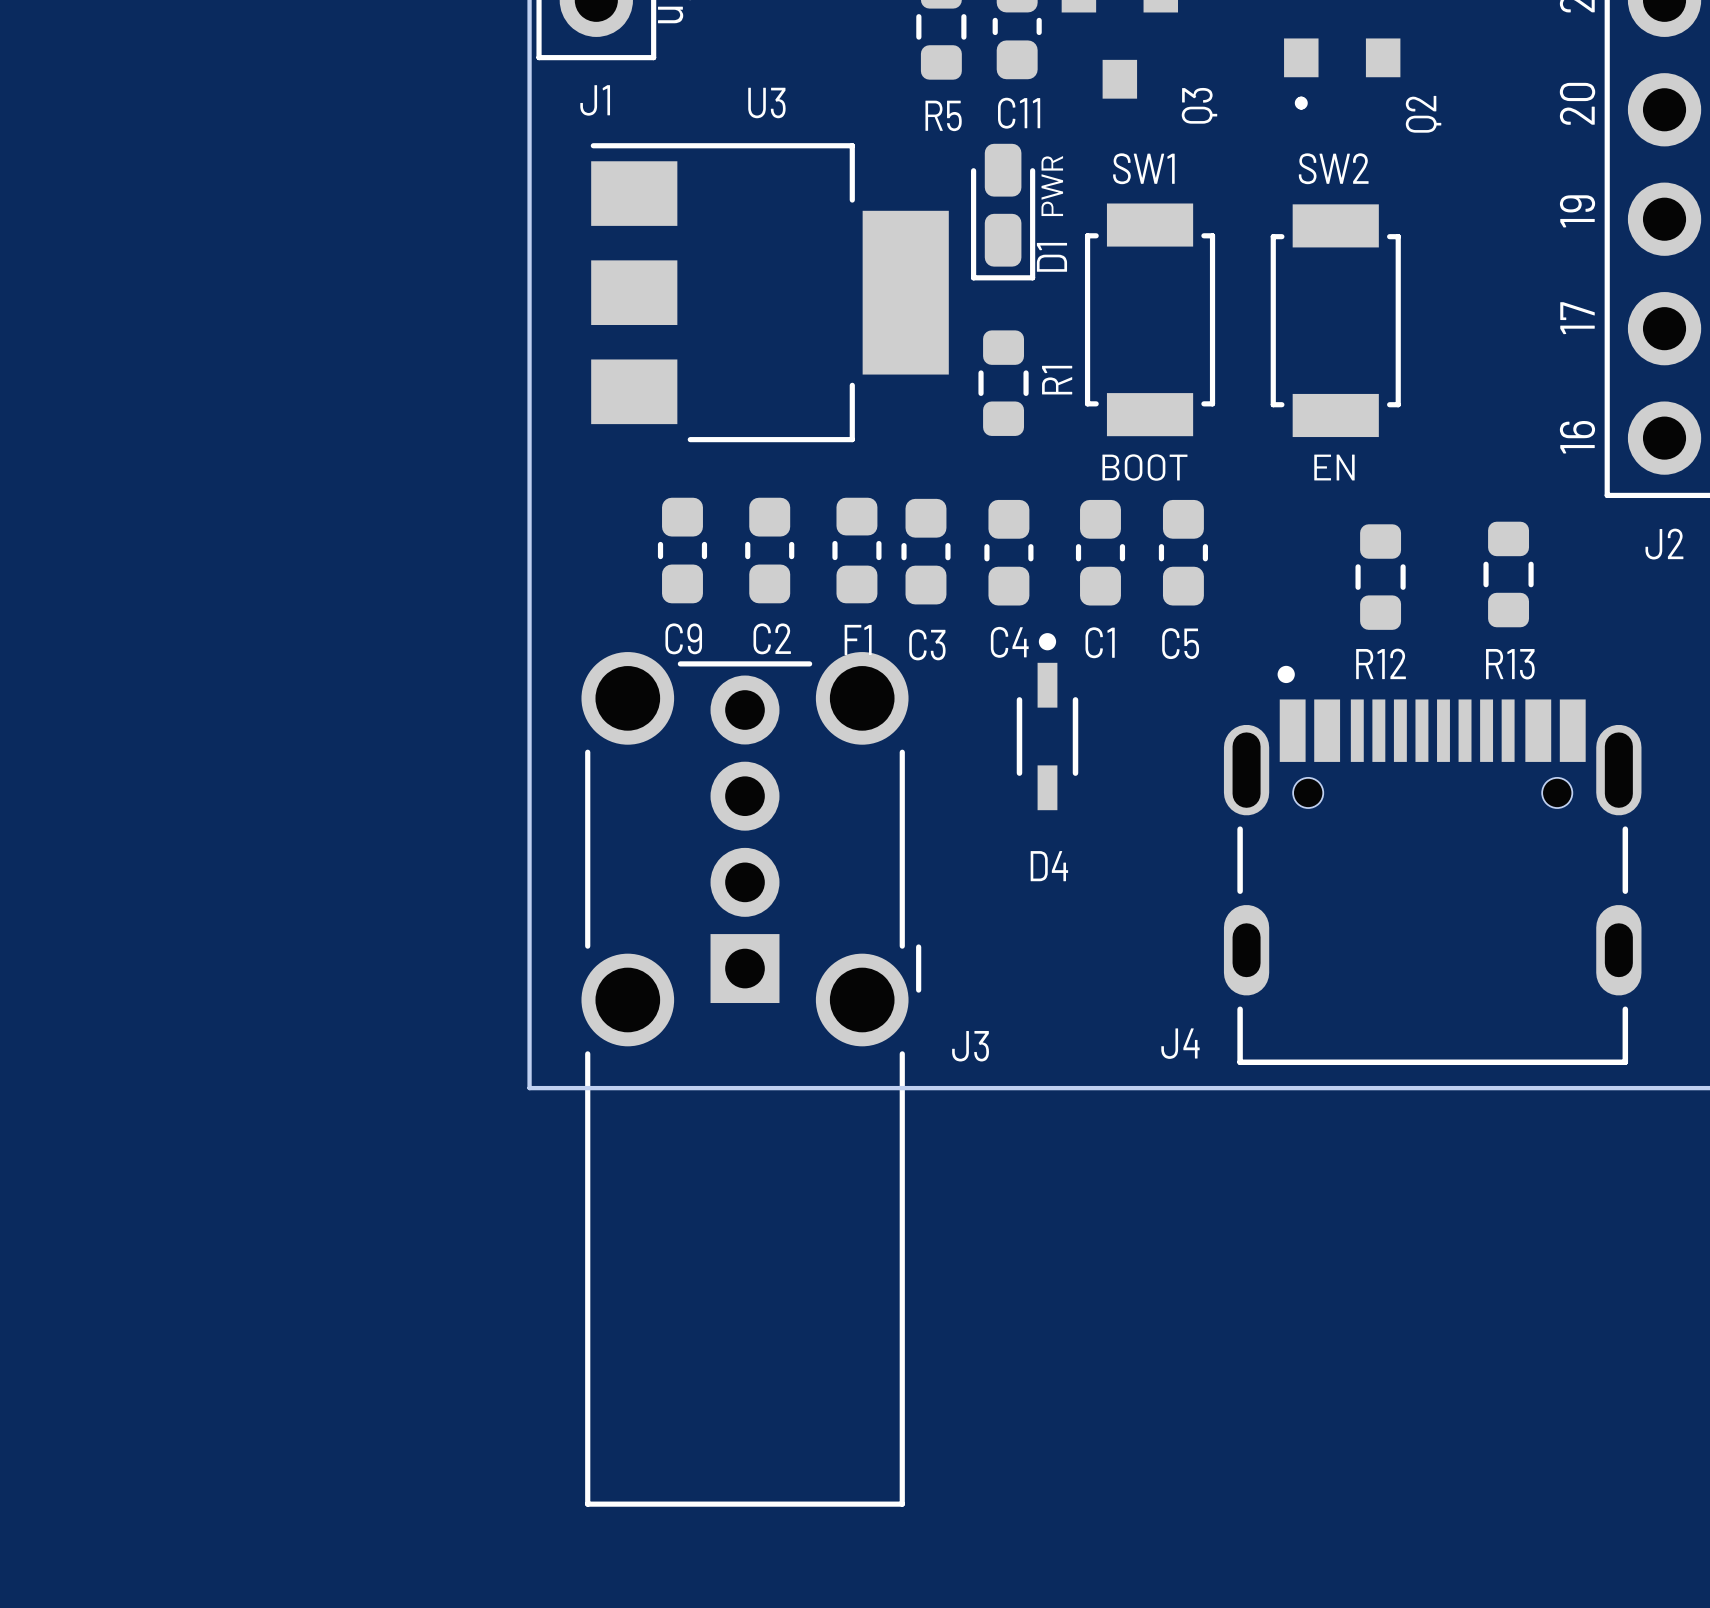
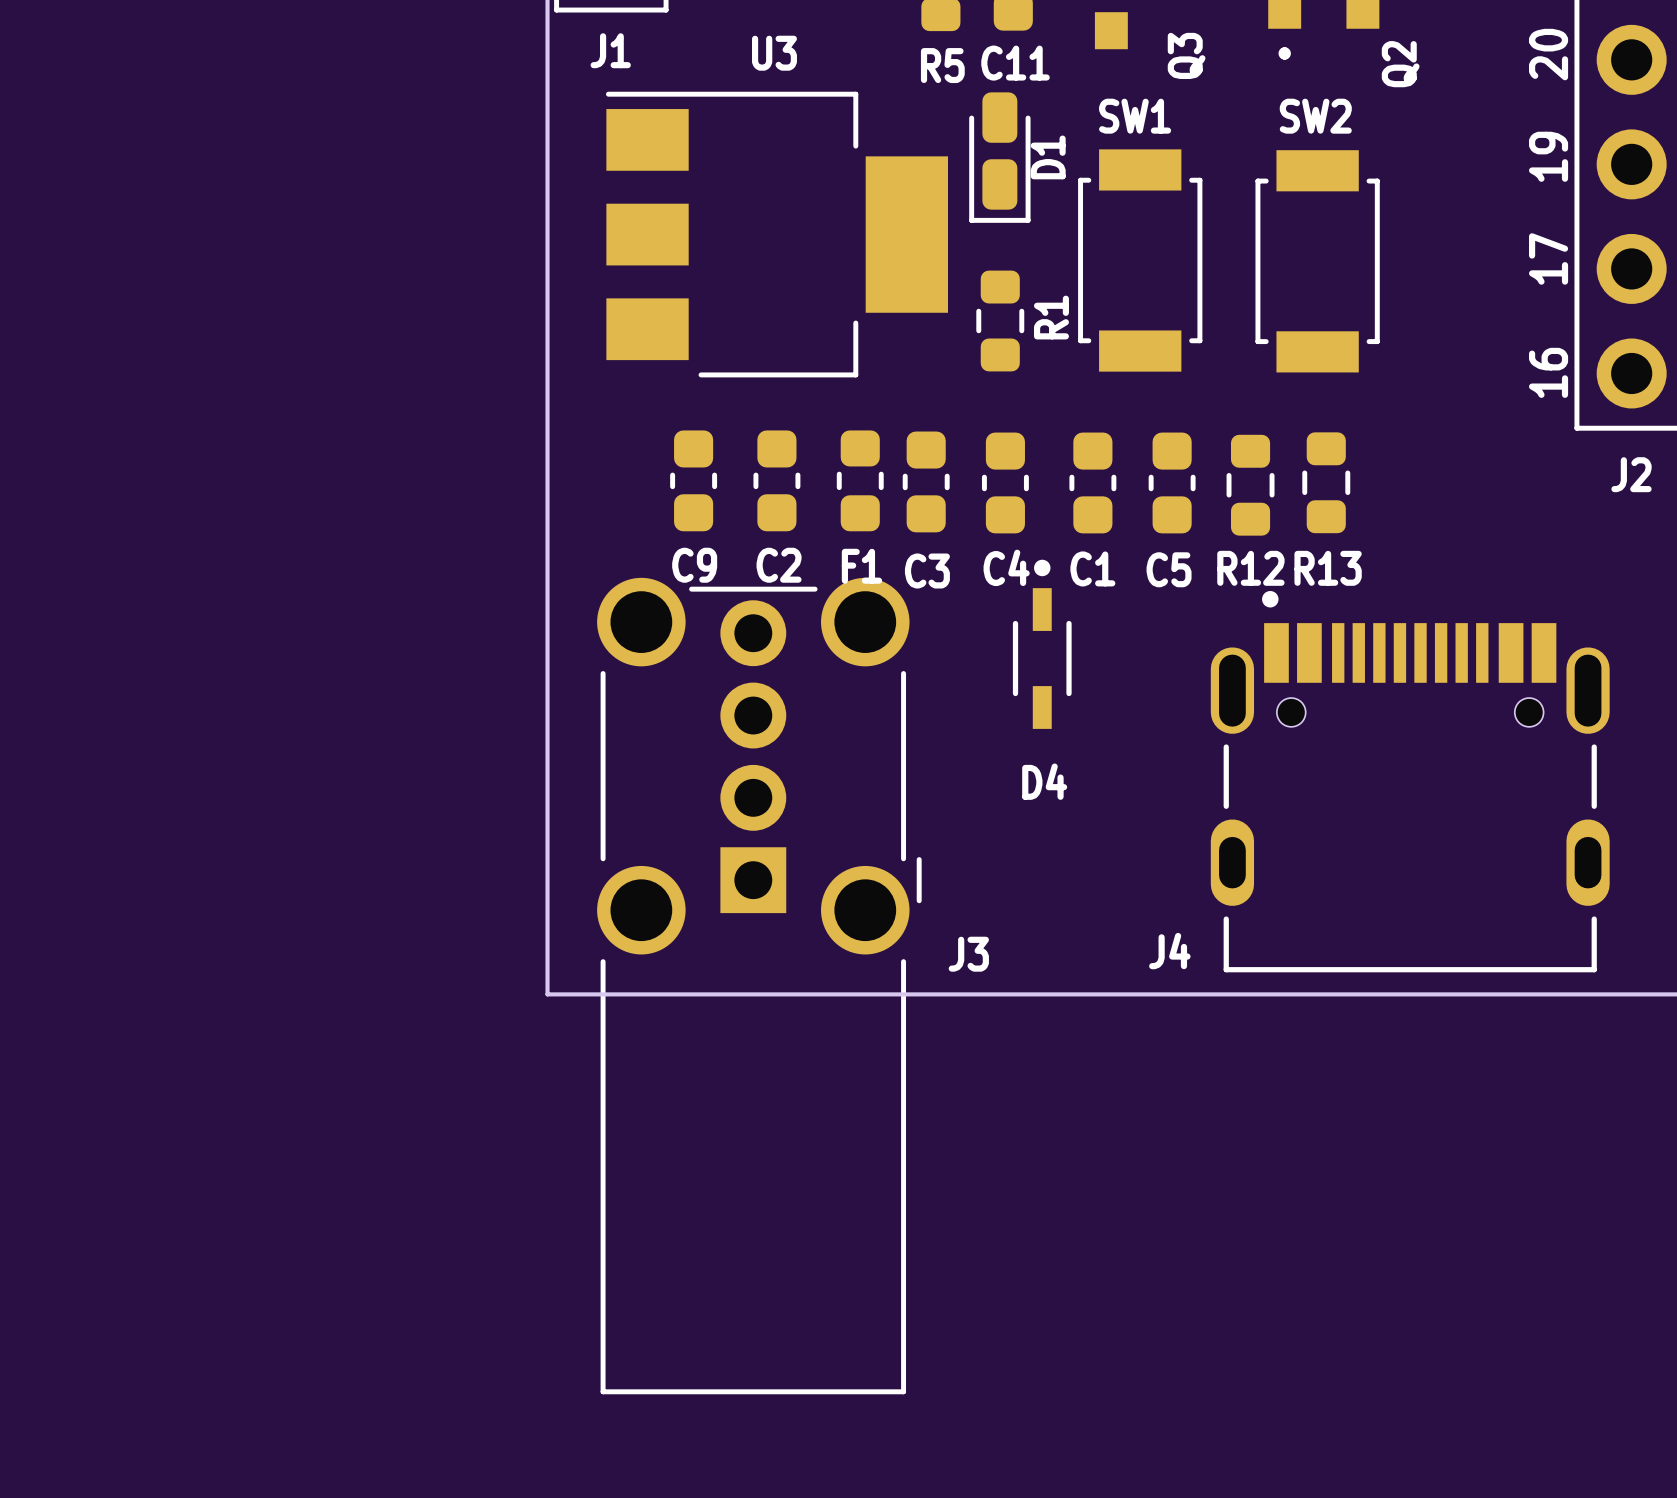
text: PWR (1052, 186) -> none
D1 name position: D1 (1051, 257) -> D1 (1048, 157)
text: BOOT (1144, 467) -> none
text: EN (1334, 467) -> none
R13 position: (1508, 574) -> (1326, 482)
R12 position: (1380, 577) -> (1250, 485)

